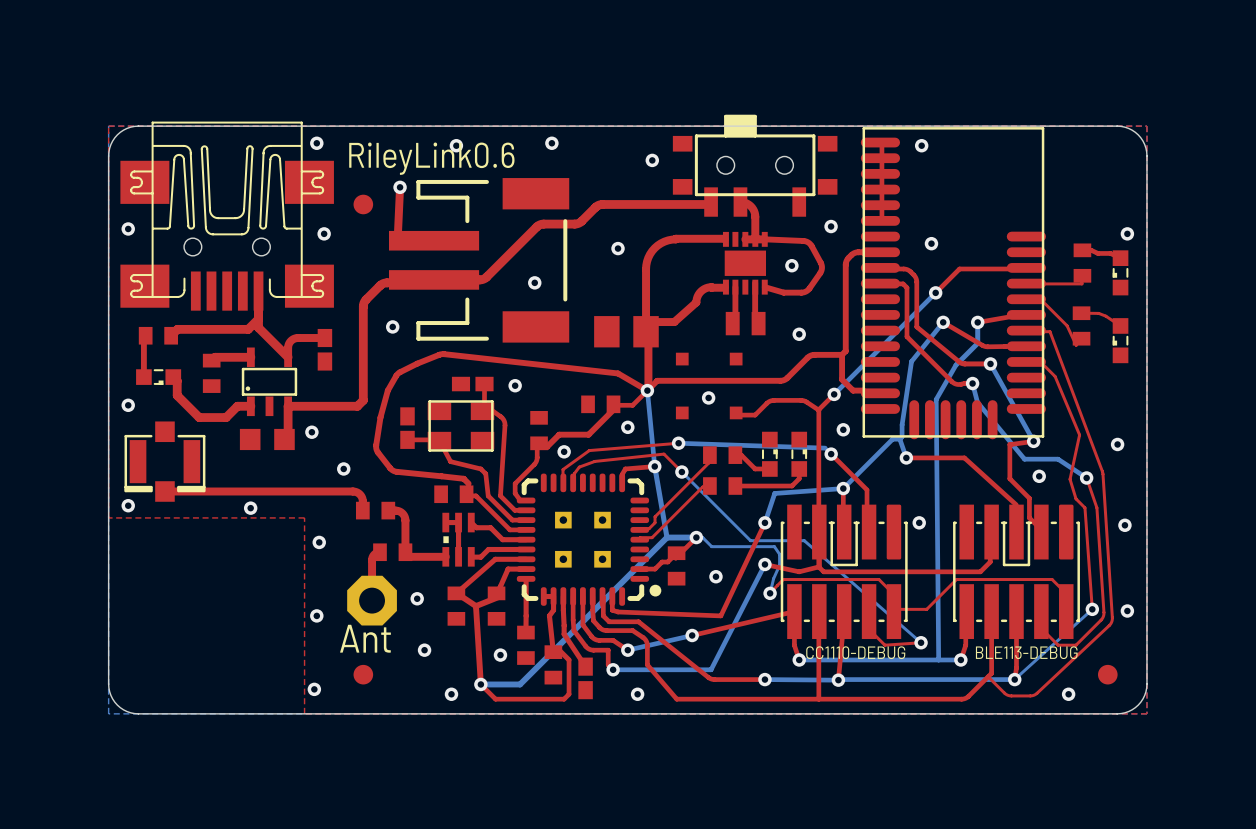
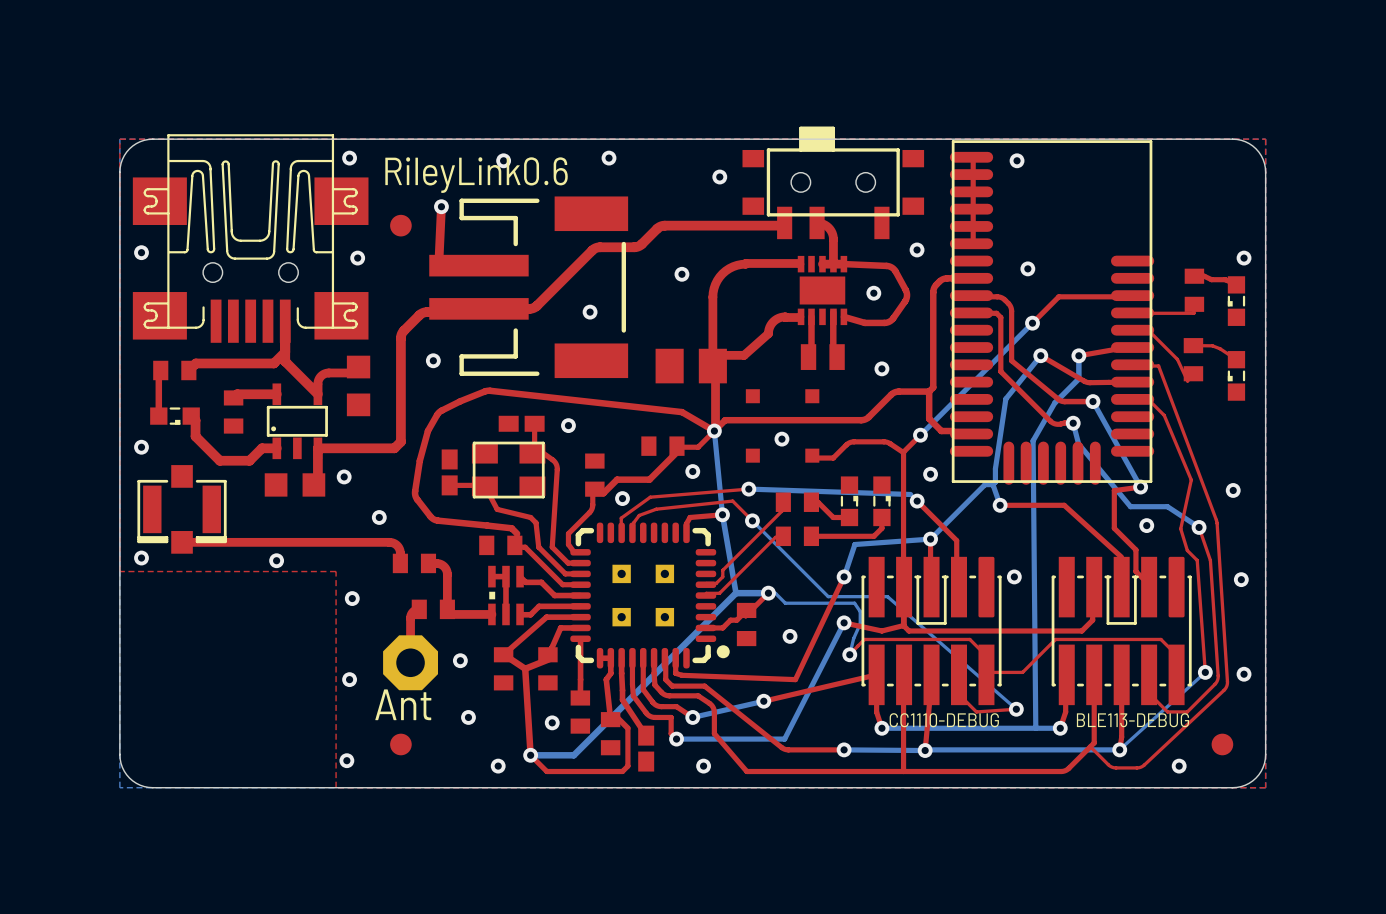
part footprint: [317, 328, 333, 371] -> [346, 355, 371, 417]

